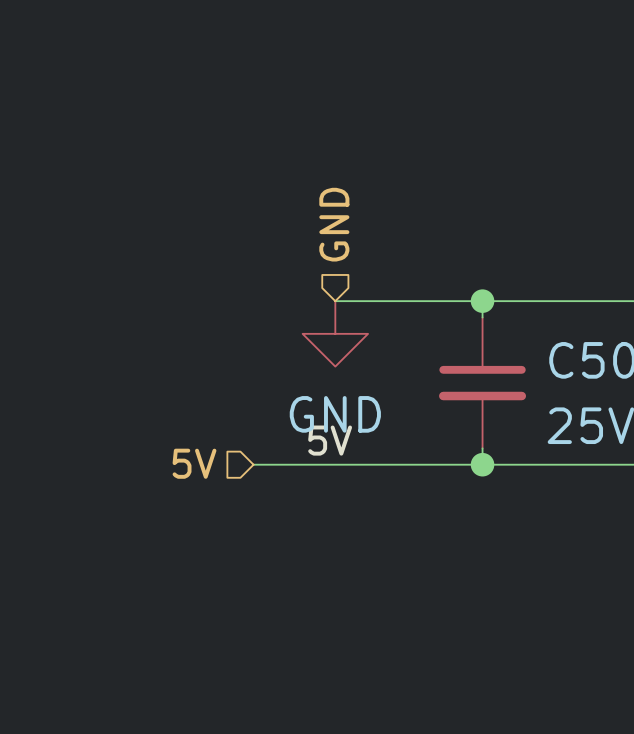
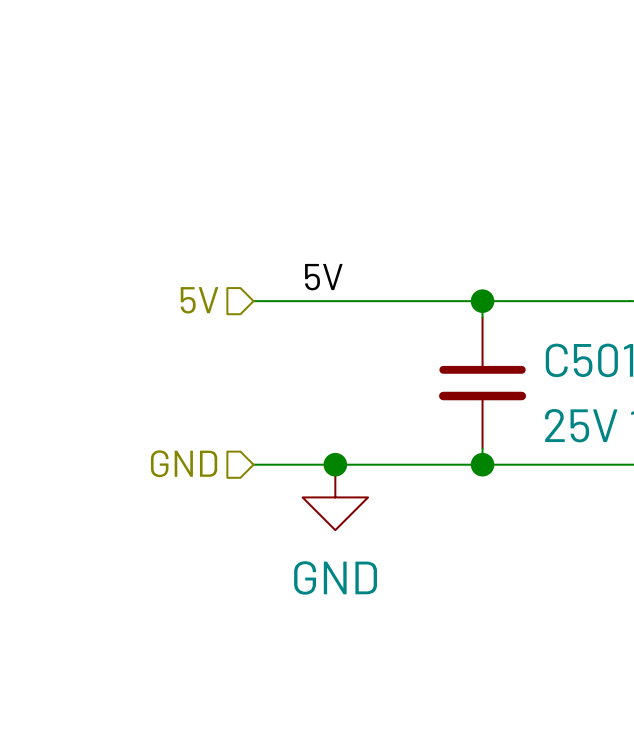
hierarchical label: GND (334, 224) -> none
hierarchical label: none -> 5V (199, 300)
wire: none -> (253, 301) (335, 301)
power symbol position: GND (335, 333) -> GND (335, 497)
label position: 5V (330, 440) -> 5V (323, 277)
hierarchical label: 5V (194, 463) -> GND (184, 463)
junction: none -> (335, 464)

